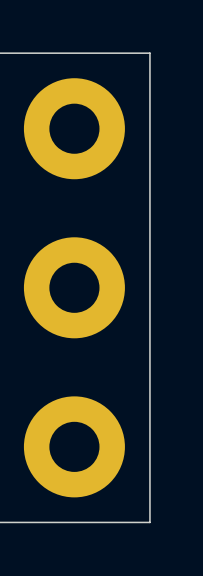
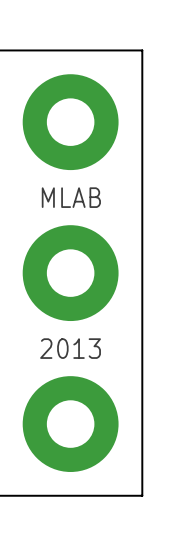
text: none -> MLAB (71, 197)
text: none -> 2013 (70, 348)

